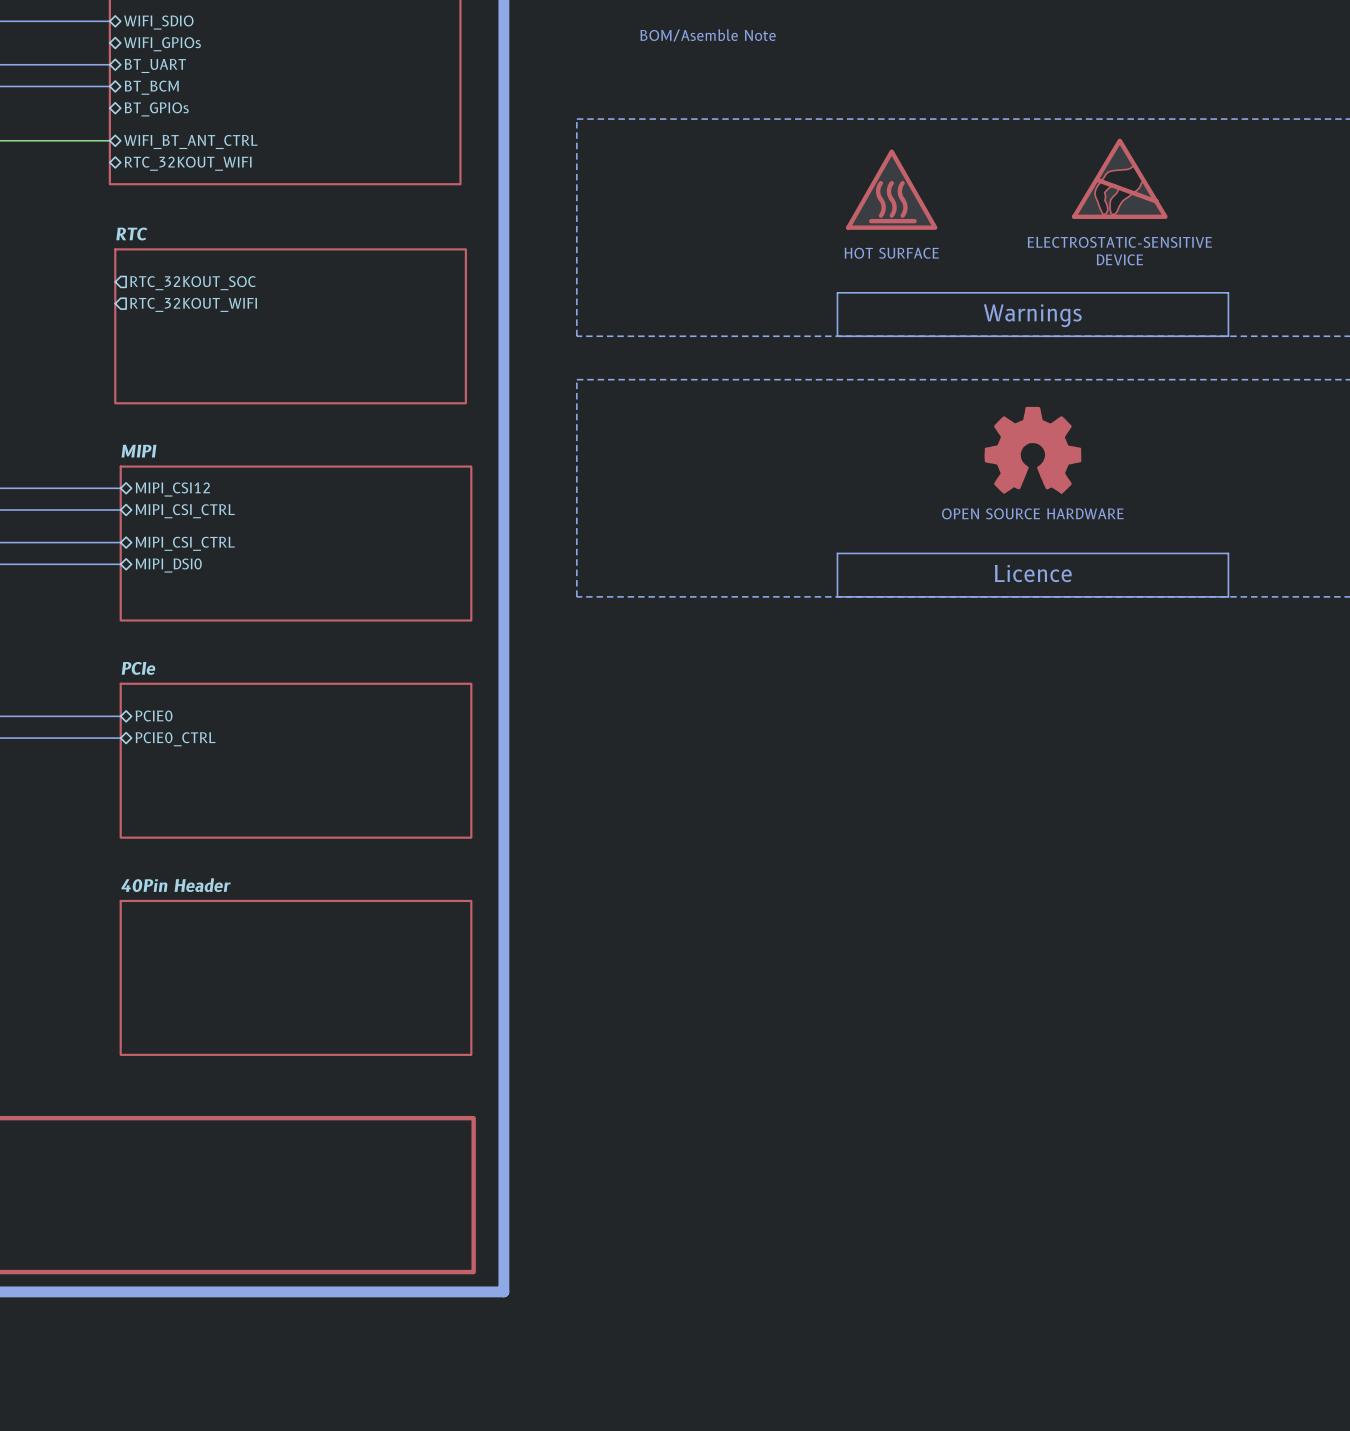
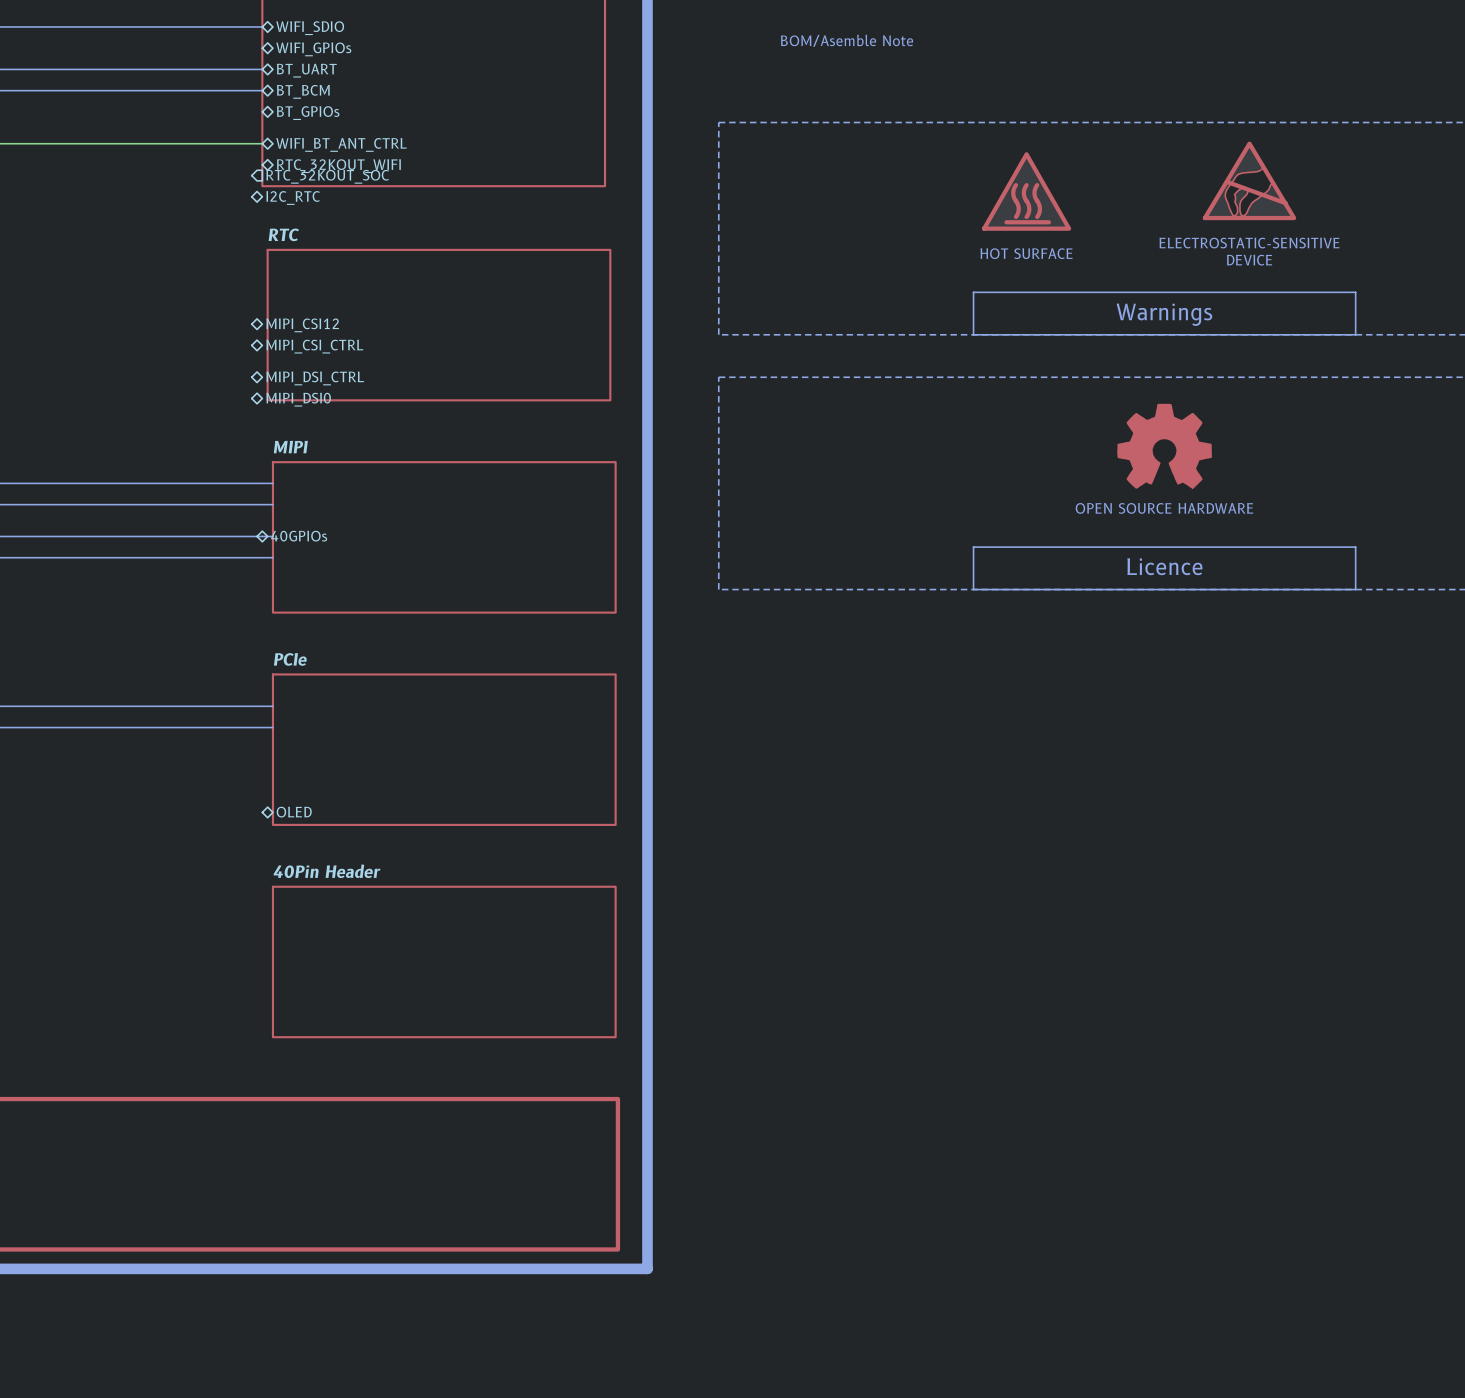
sheet pin: none -> I2C_RTC (293, 198)
sheet pin position: RTC_32KOUT_SOC (192, 283) -> RTC_32KOUT_SOC (327, 176)
sheet pin: RTC_32KOUT_WIFI (193, 304) -> none
sheet pin: none -> MIPI_CSI_CTRL (314, 346)
sheet pin: none -> MIPI_DSI_CTRL (315, 378)
sheet pin position: MIPI_CSI12 (172, 489) -> MIPI_CSI12 (302, 325)
sheet pin: MIPI_CSI_CTRL (185, 511) -> none
sheet pin: none -> 40GPIOs (299, 536)
sheet pin: MIPI_CSI_CTRL (185, 543) -> none
sheet pin position: MIPI_DSI0 (168, 565) -> MIPI_DSI0 (298, 399)
sheet pin: PCIE0 (154, 715) -> none
sheet pin: PCIE0_CTRL (175, 739) -> none
sheet pin: none -> OLED (294, 812)

